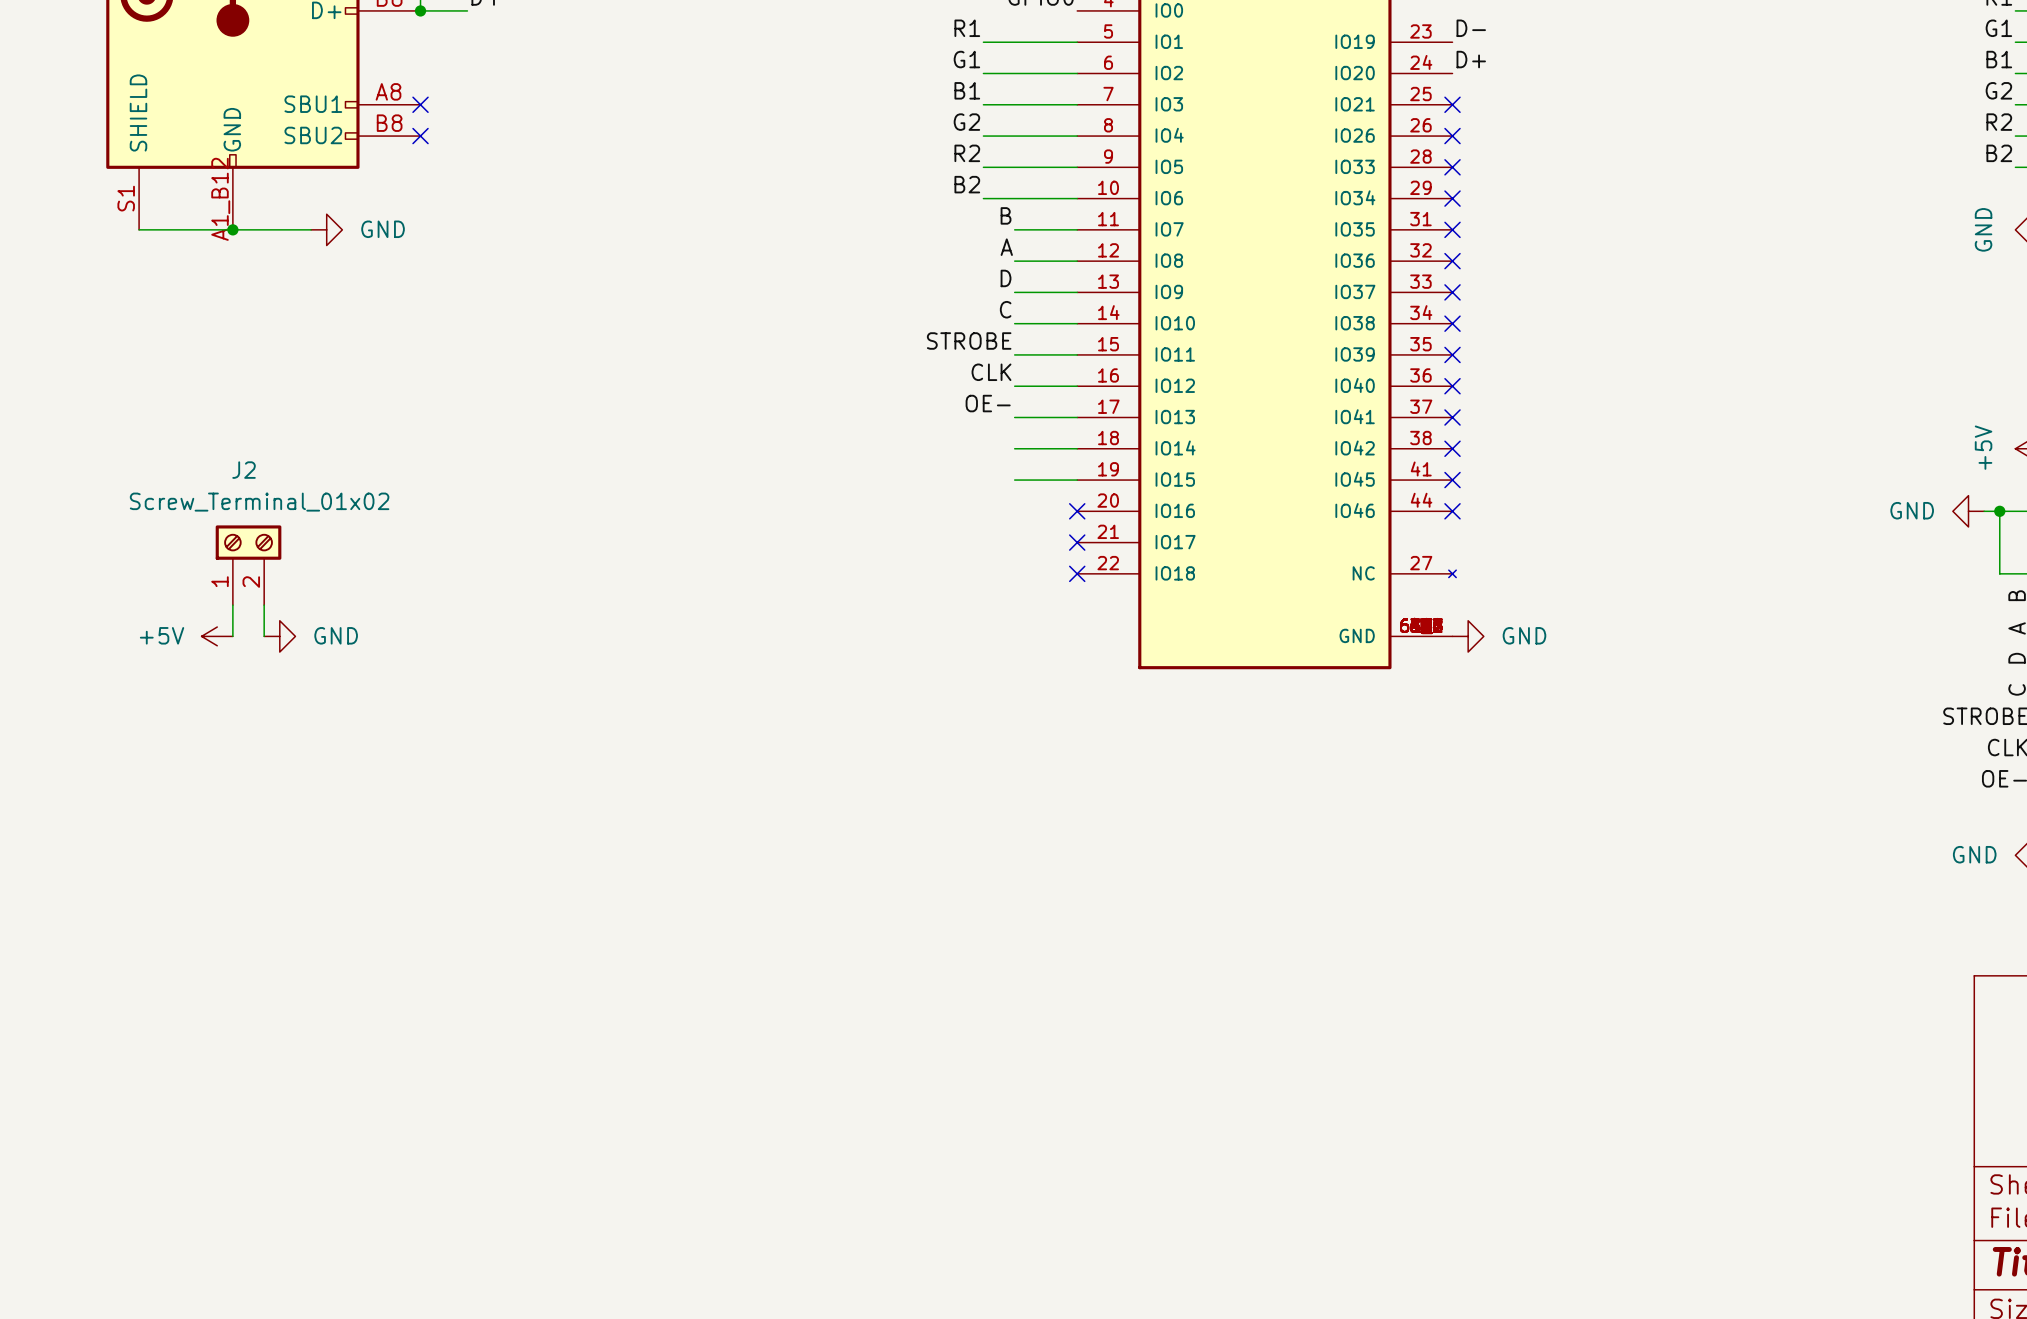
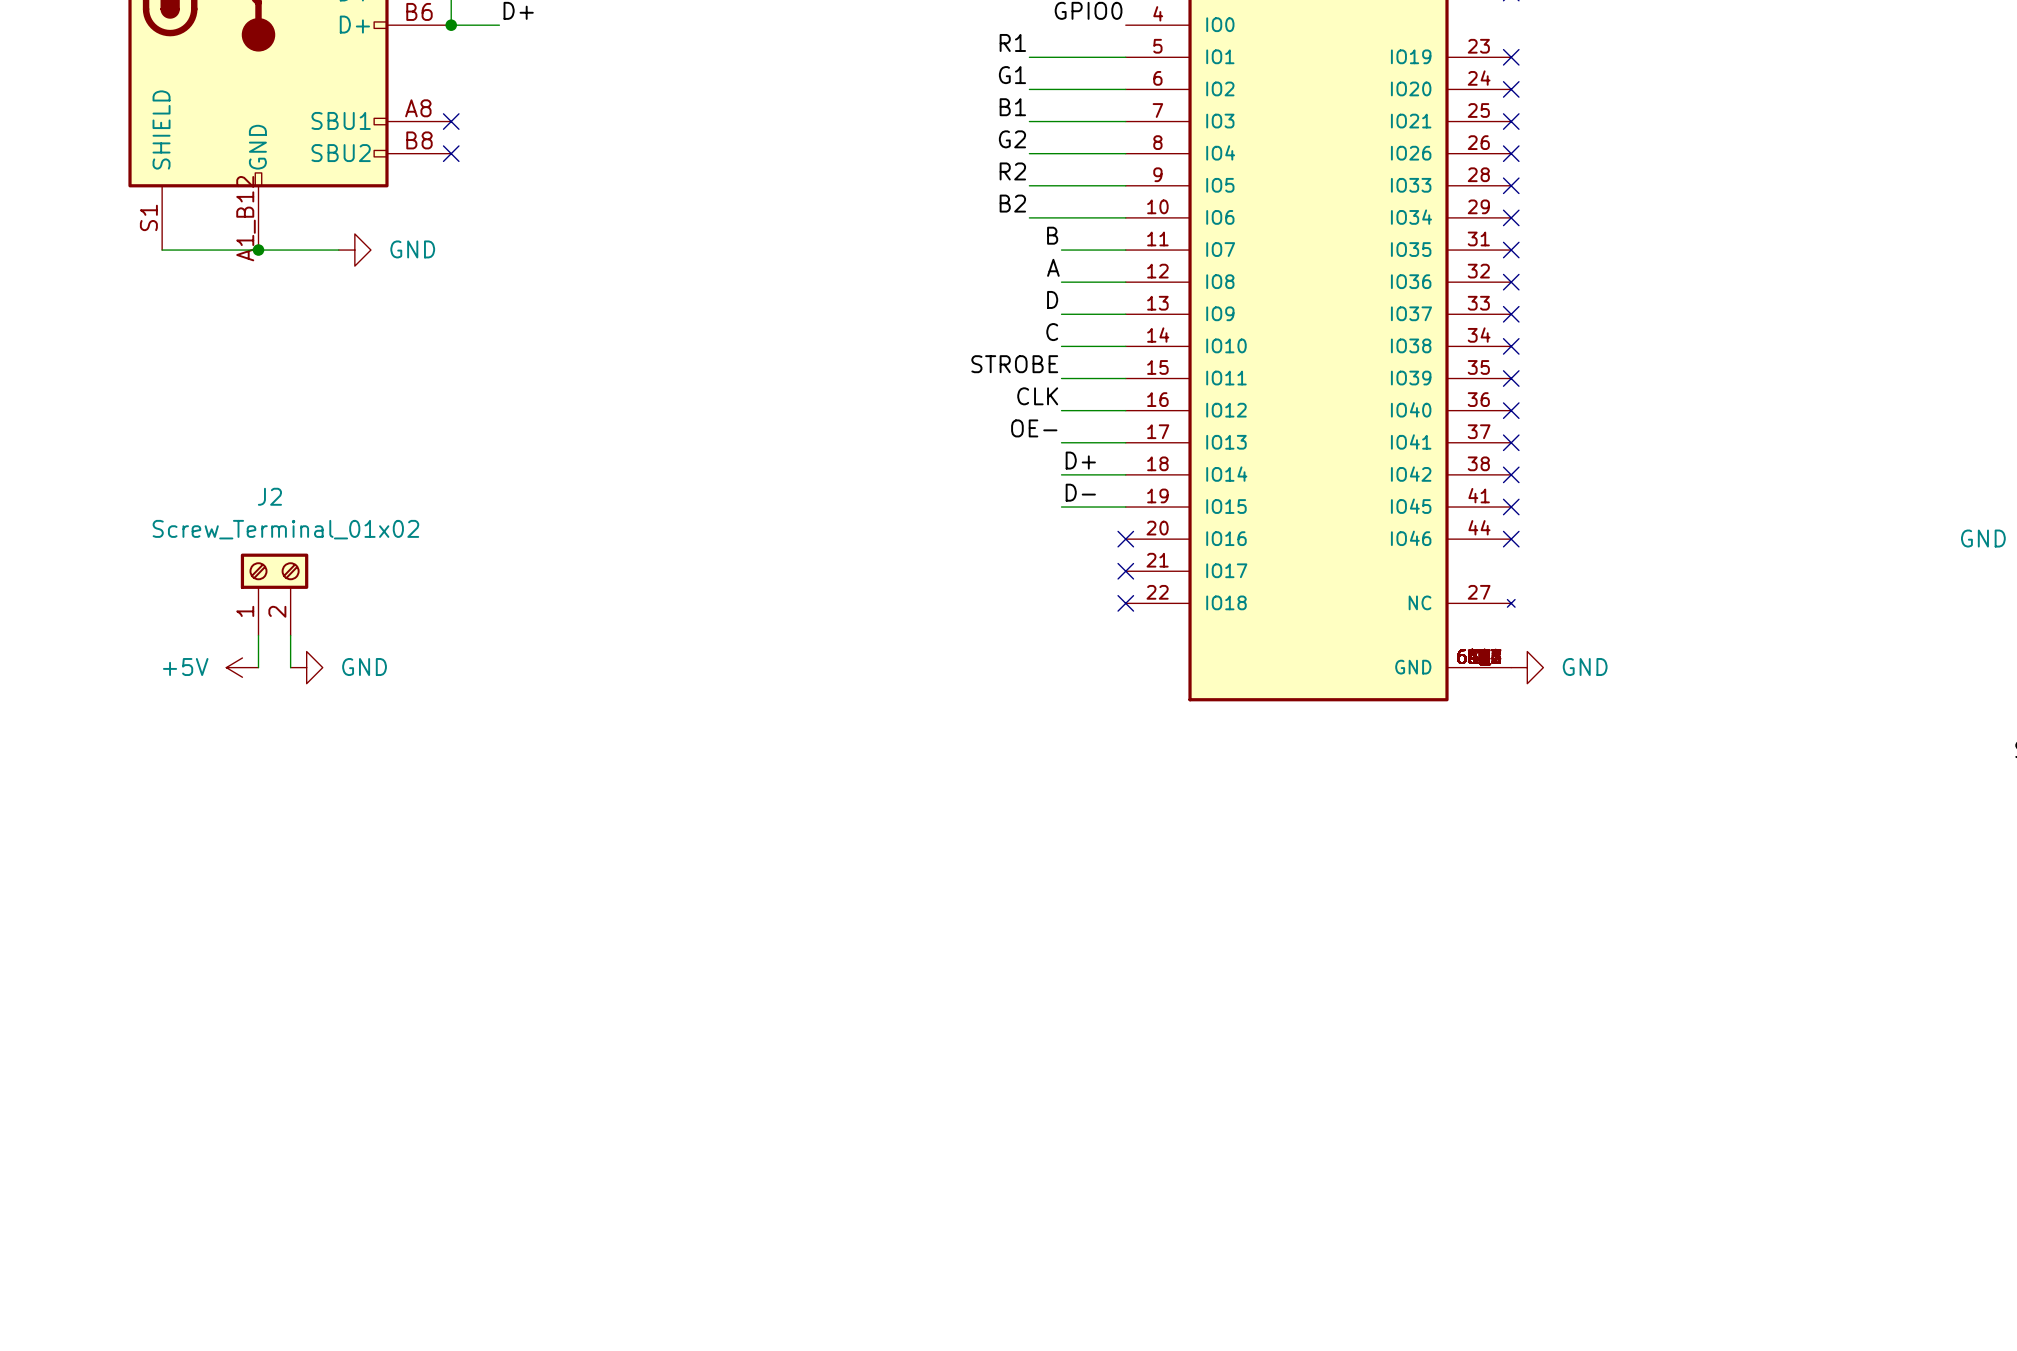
label: D- (1471, 28) -> none
no-connect mark: none -> (1511, 57)
label: D+ (1471, 59) -> none
no-connect mark: none -> (1511, 89)
label: none -> D+ (1080, 460)
label: none -> D- (1080, 492)

